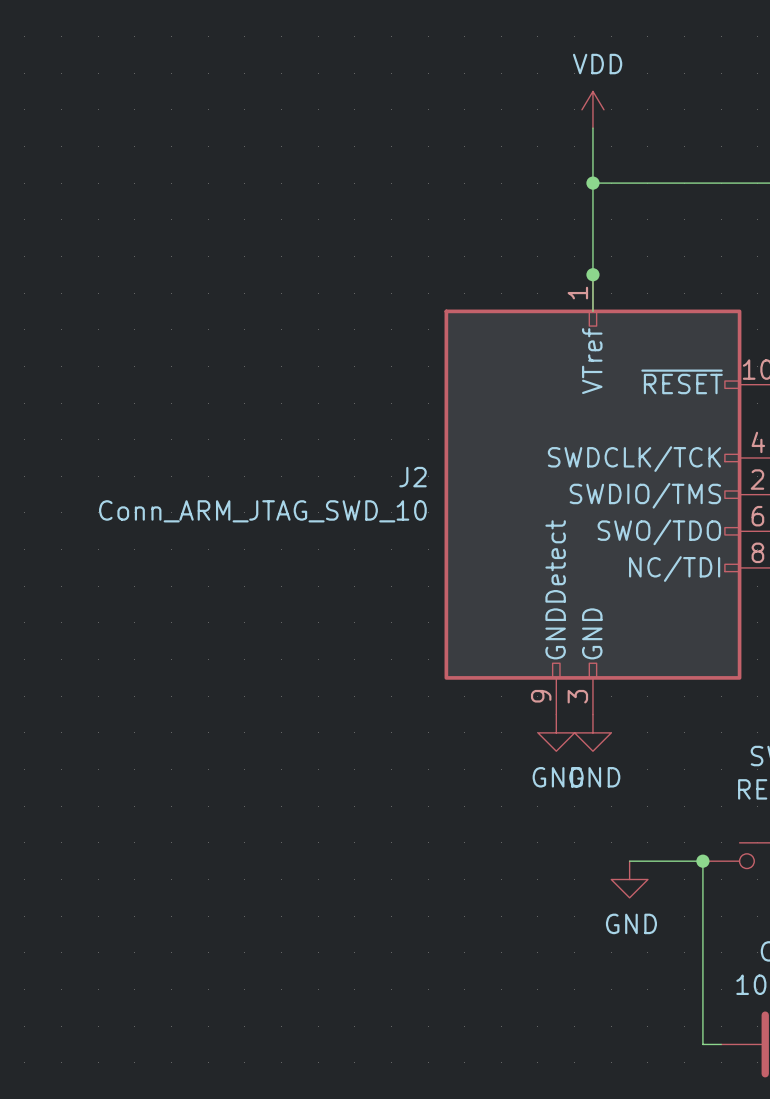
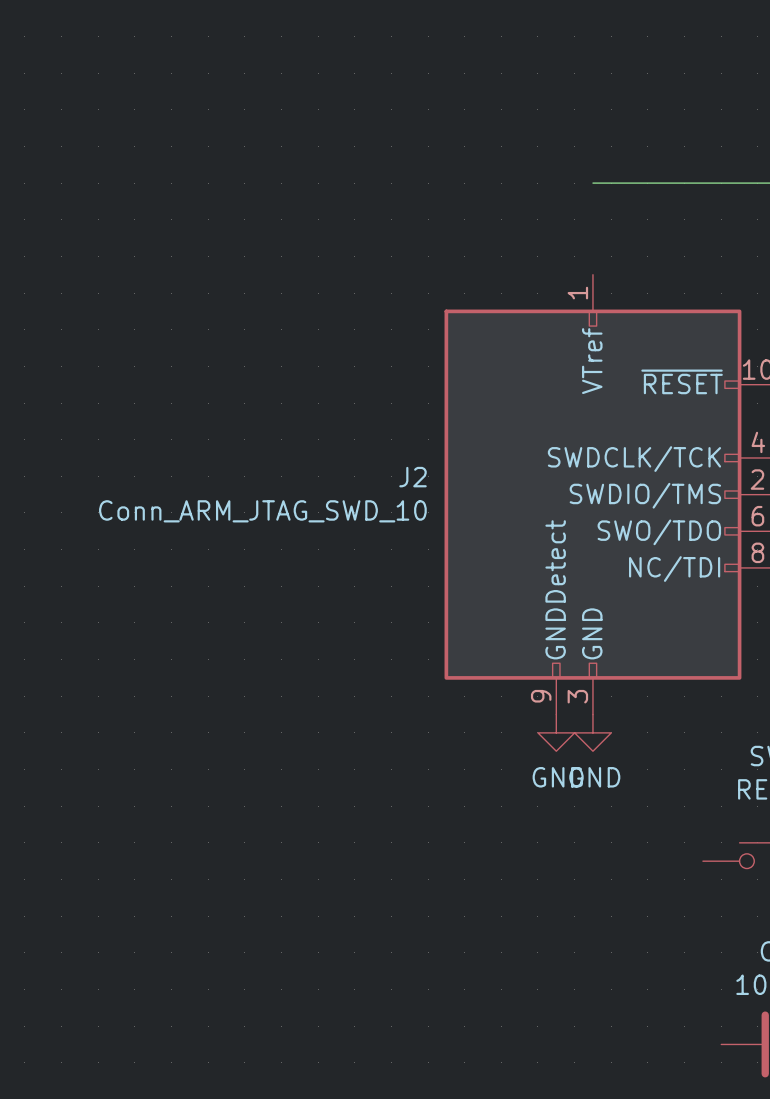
power symbol: VDD (592, 109) -> none
wire: (592, 128) (592, 311) -> none
junction: (592, 183) -> none
junction: (592, 274) -> none
wire: (629, 861) (702, 861) (702, 1044) (721, 1044) -> none
junction: (702, 861) -> none
power symbol: GND (629, 879) -> none

